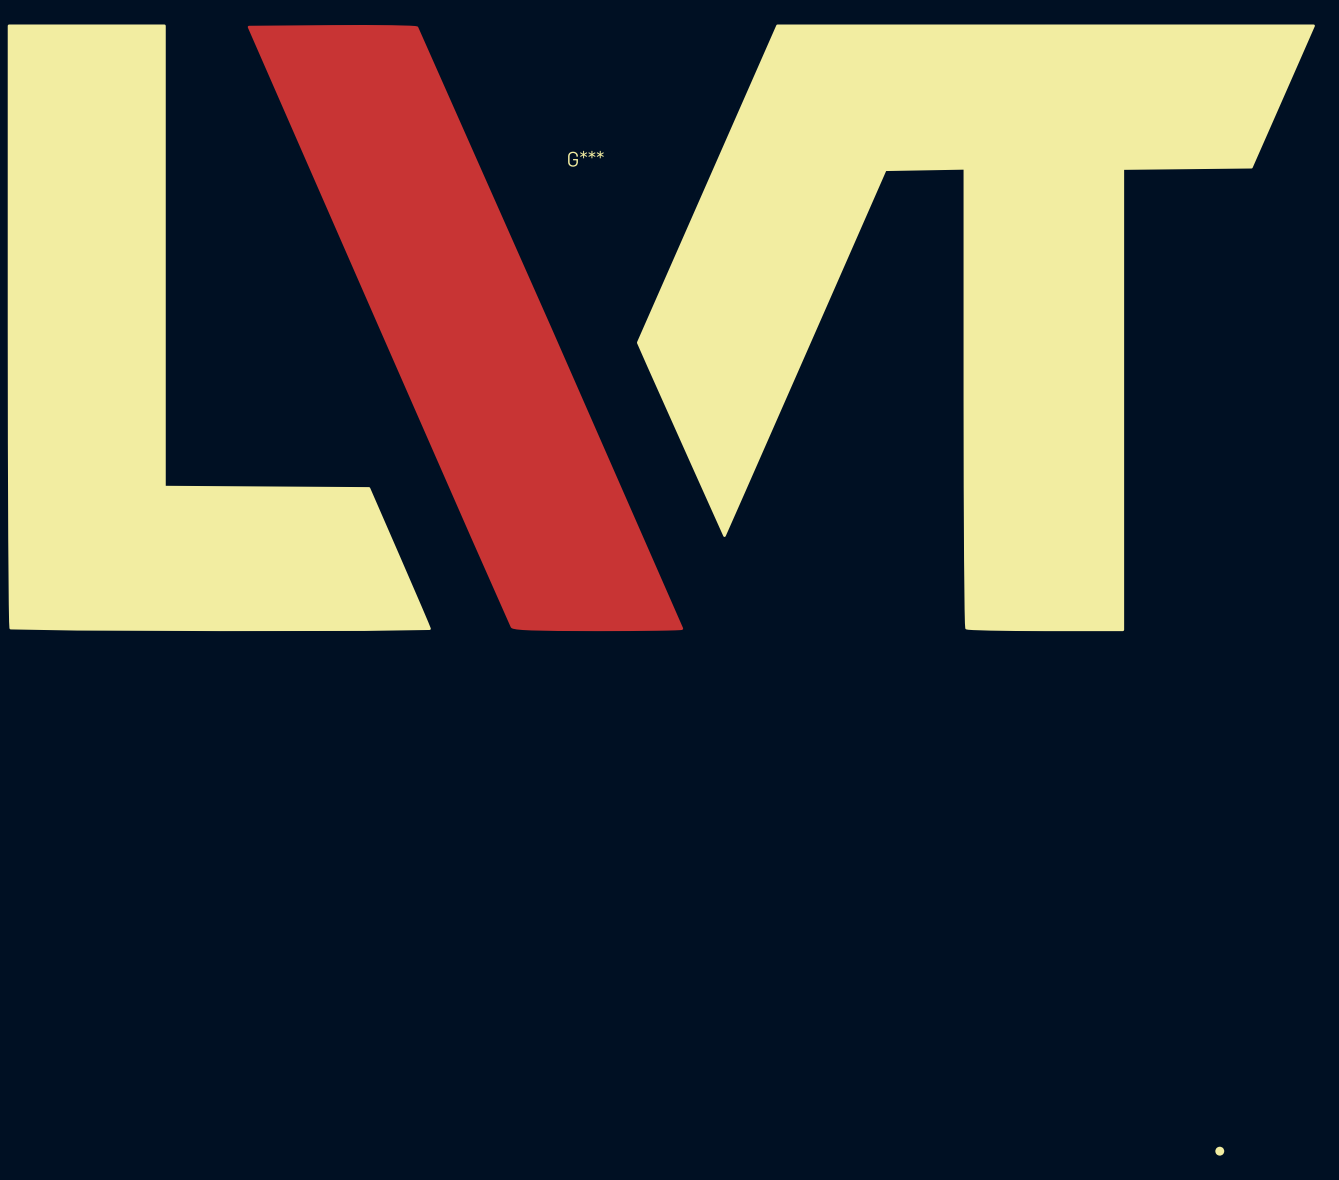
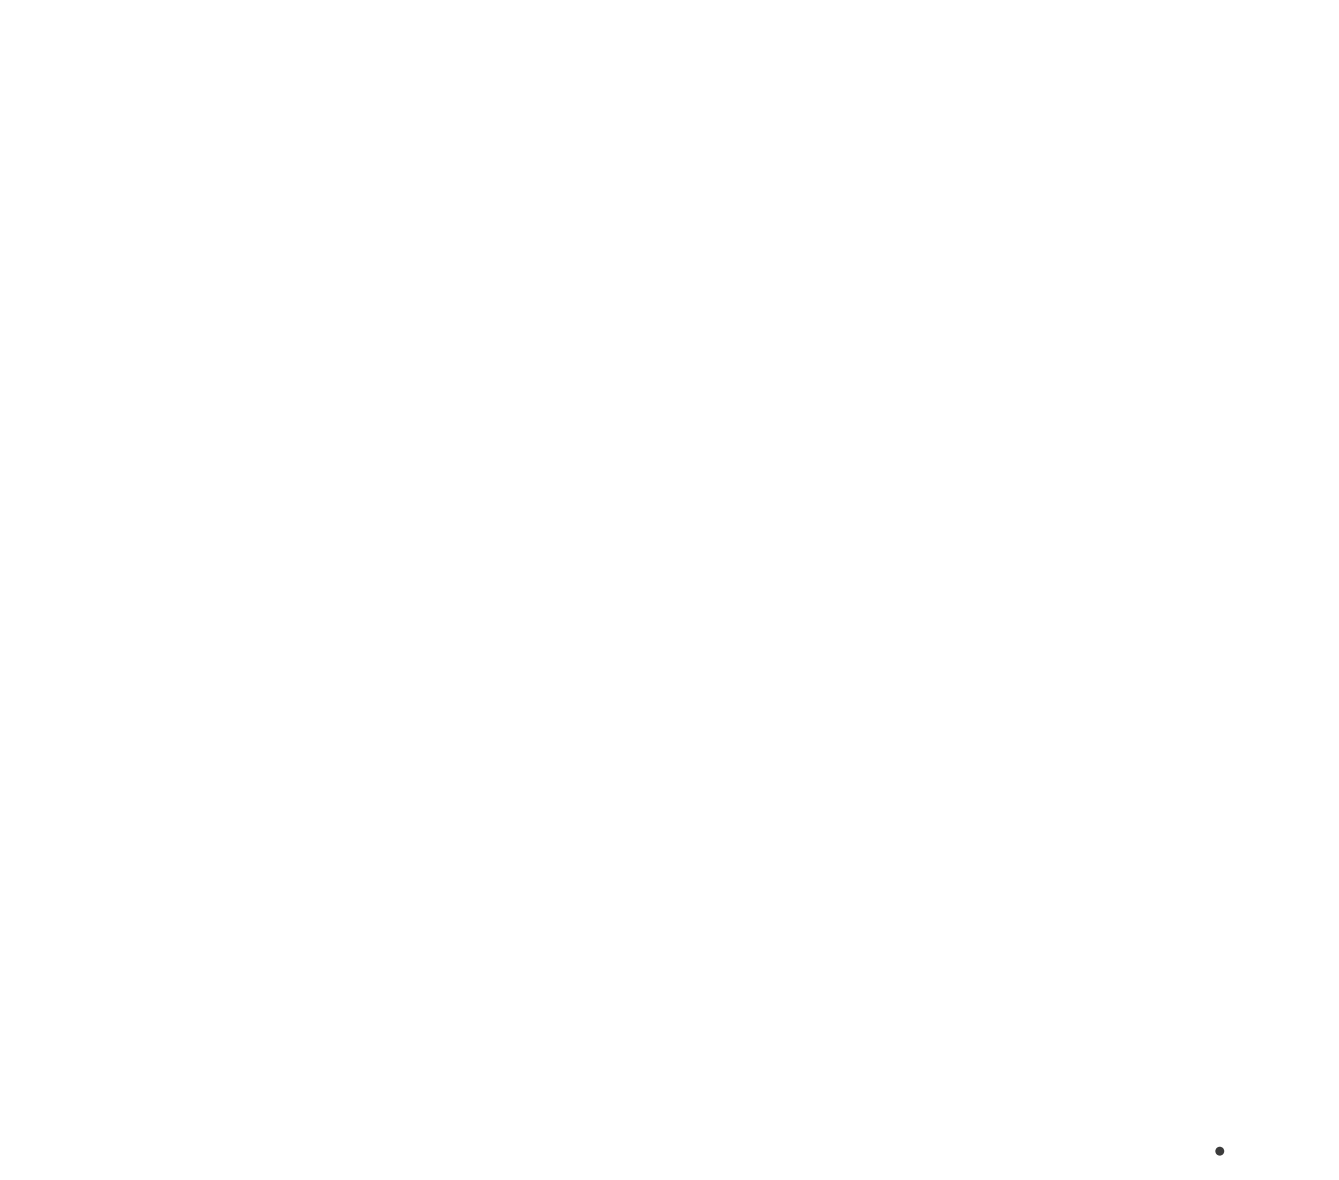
G***: (661, 327) -> none

